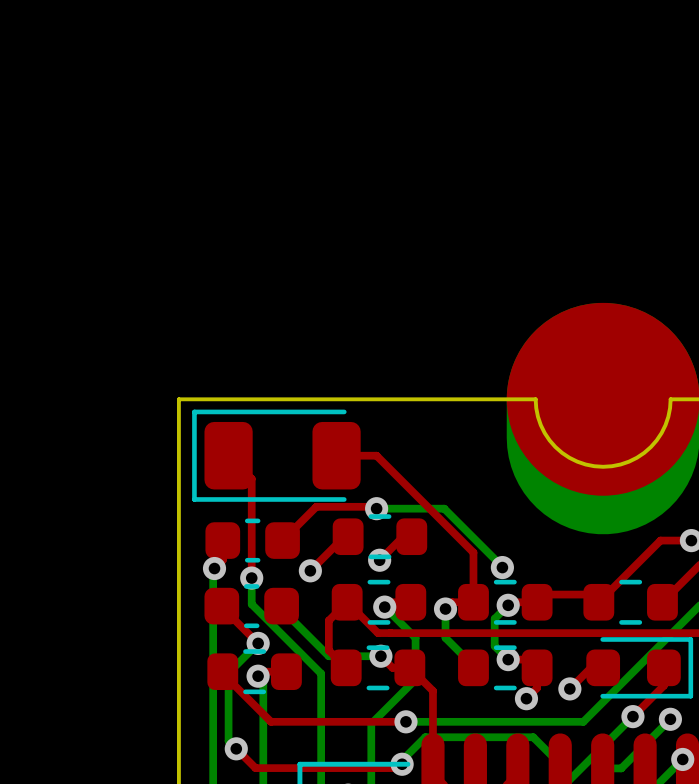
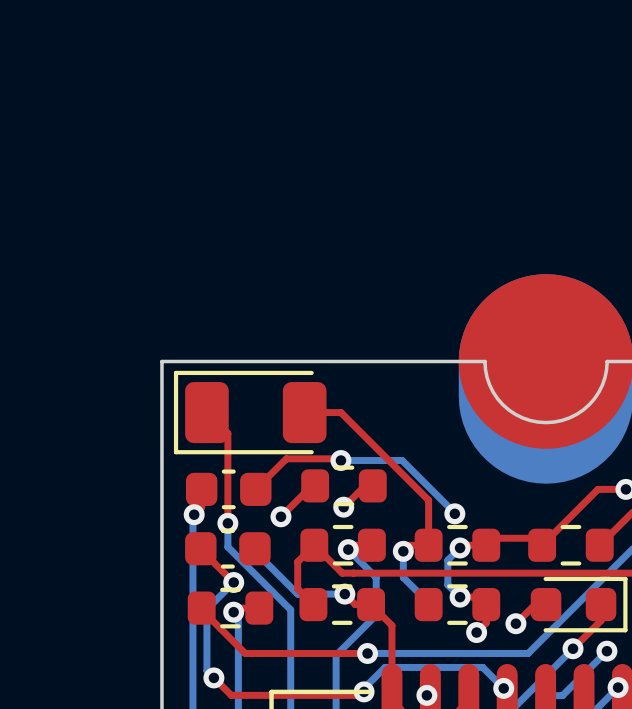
via: none -> (503, 688)
via: none -> (426, 695)

